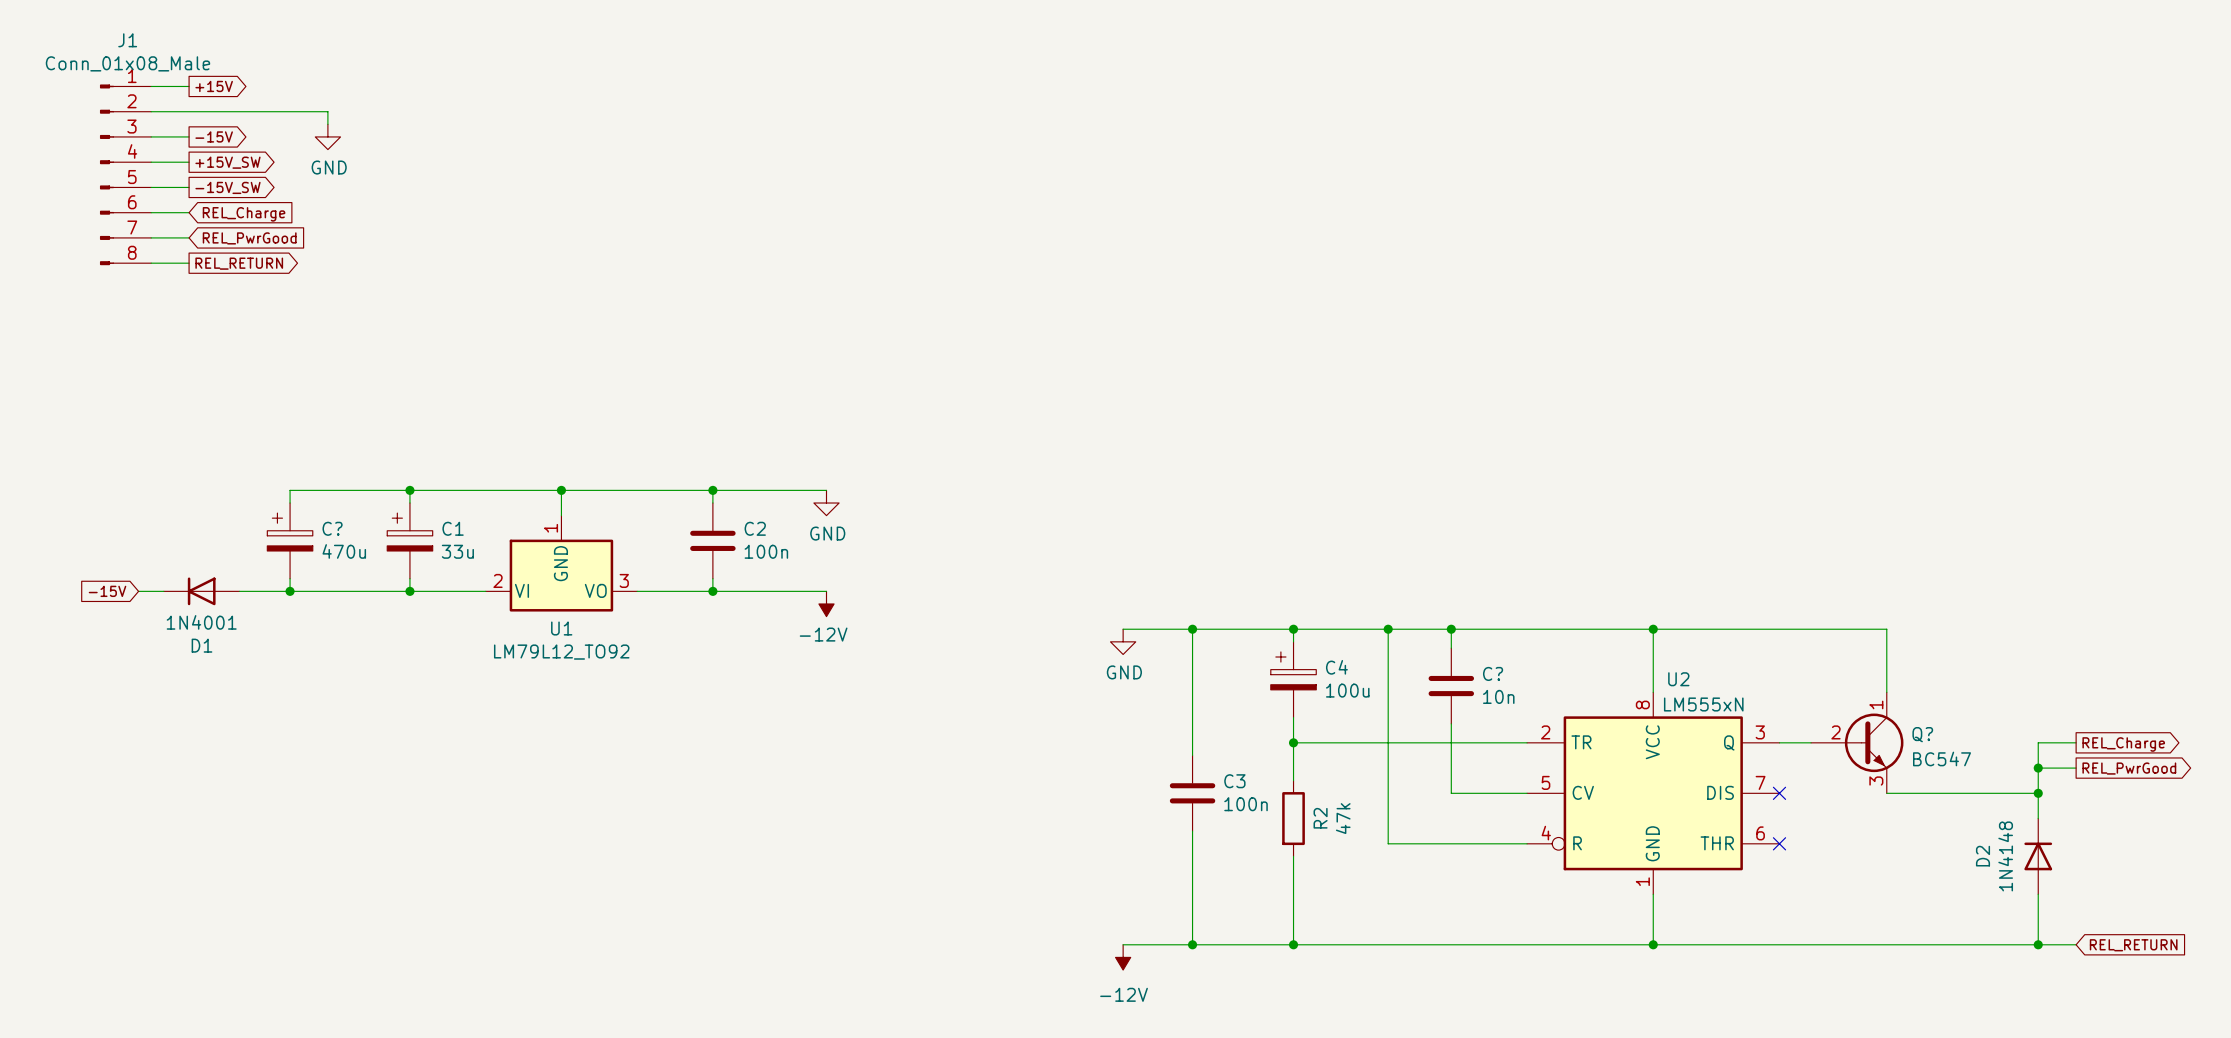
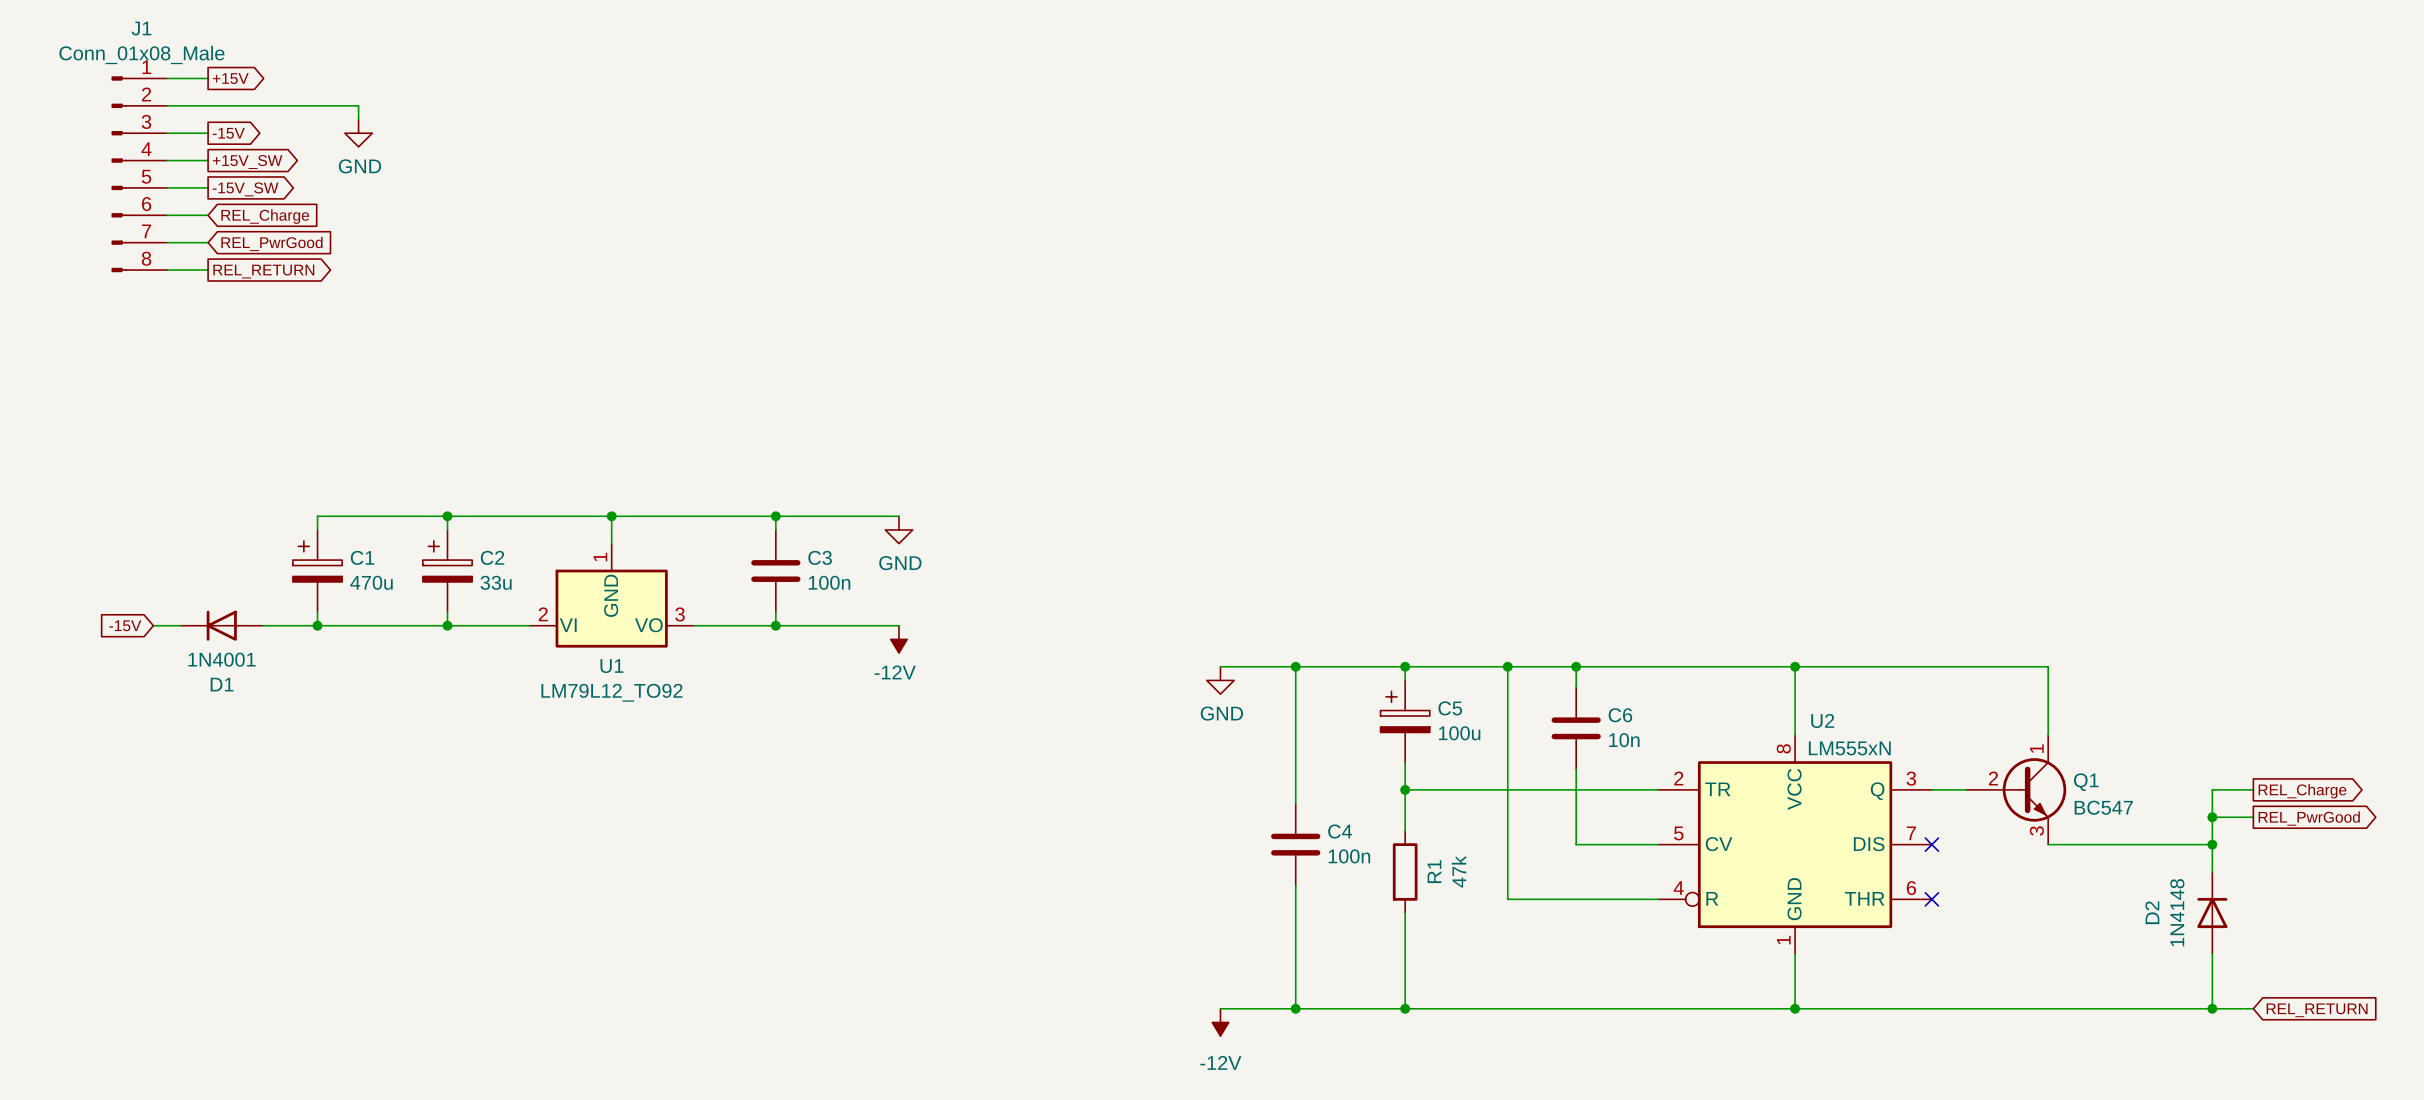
C? name: C? (332, 528) -> C1 (362, 557)
C1 name: C1 (453, 528) -> C2 (492, 557)
C2 name: C2 (755, 528) -> C3 (820, 557)
C4 name: C4 (1336, 667) -> C5 (1450, 708)
C? name: C? (1493, 673) -> C6 (1620, 715)
Q? name: Q? (1922, 734) -> Q1 (2086, 782)
C3 name: C3 (1234, 781) -> C4 (1340, 831)
R2 name: R2 (1320, 818) -> R1 (1434, 871)

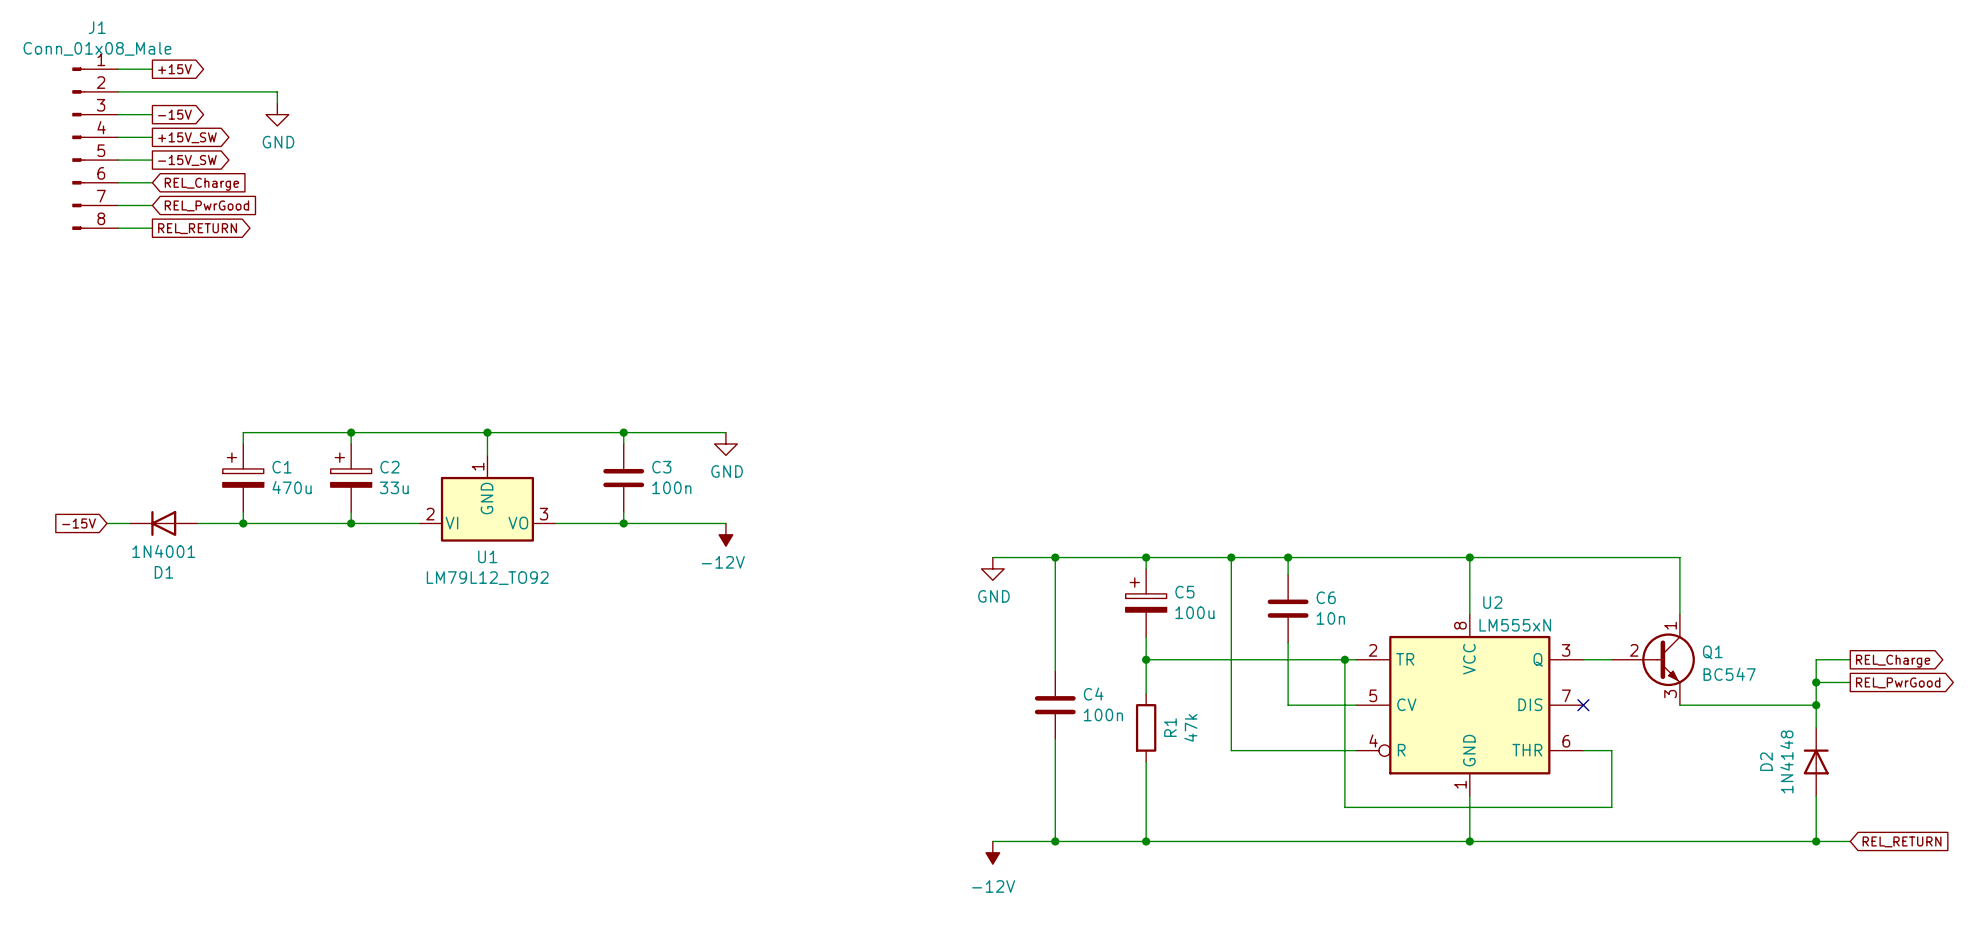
wire: none -> (1344, 659) (1344, 807) (1611, 807) (1611, 750) (1583, 750)
junction: none -> (1344, 659)
no-connect mark: (1931, 899) -> none

